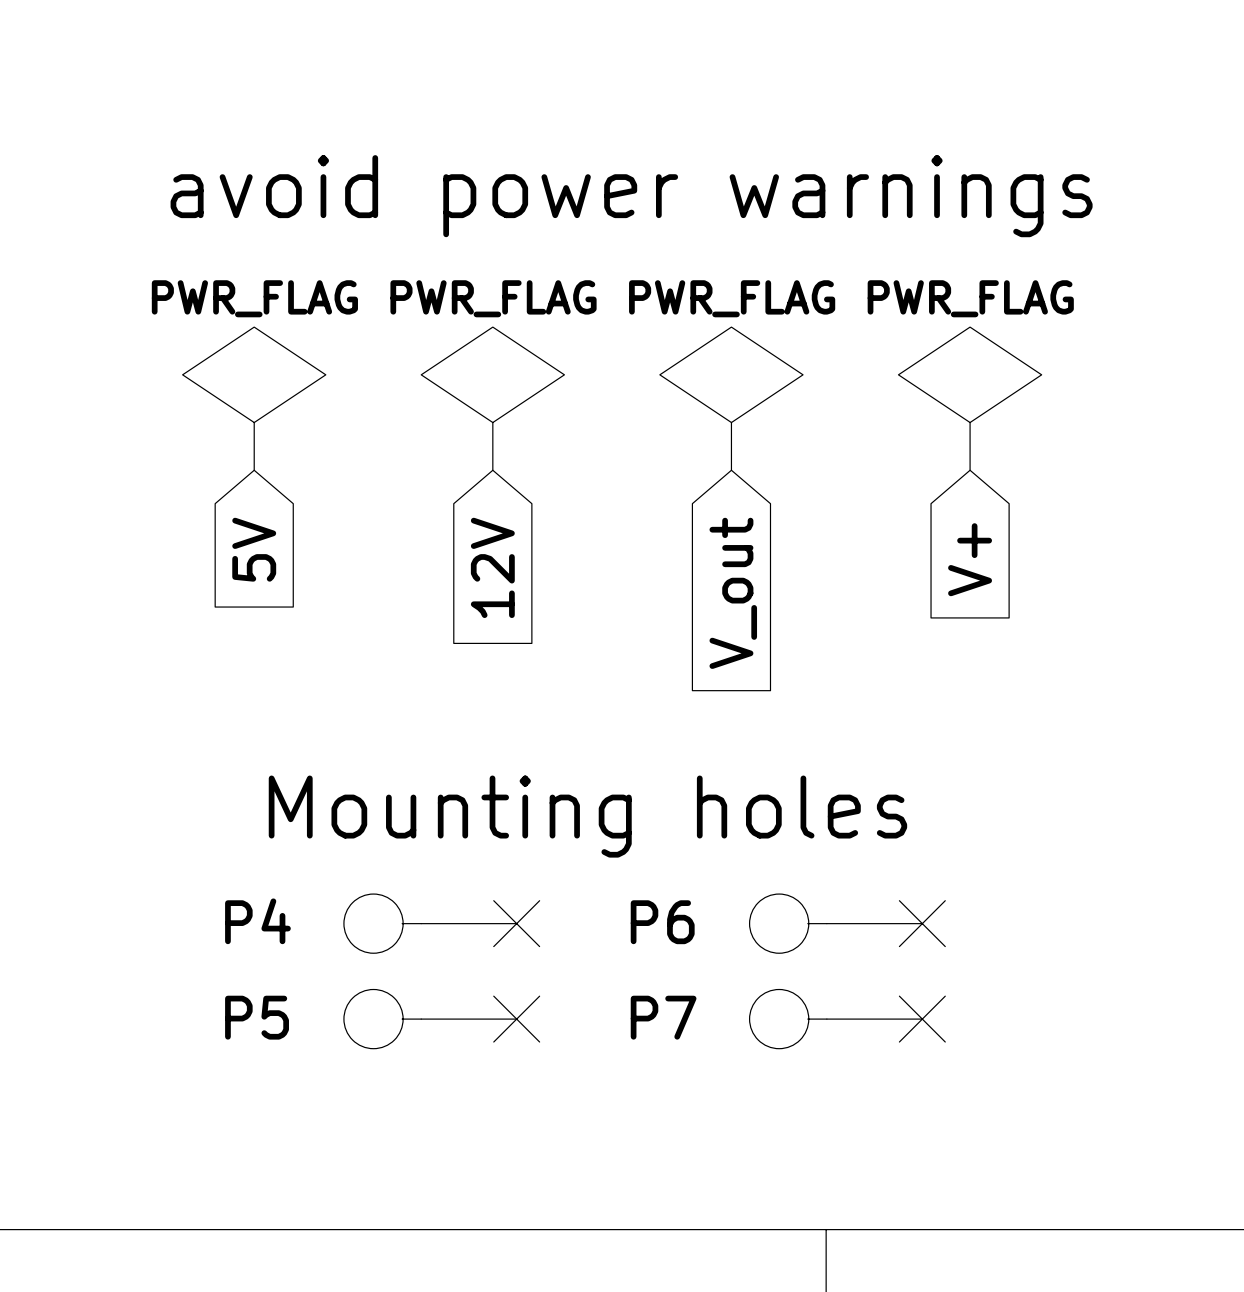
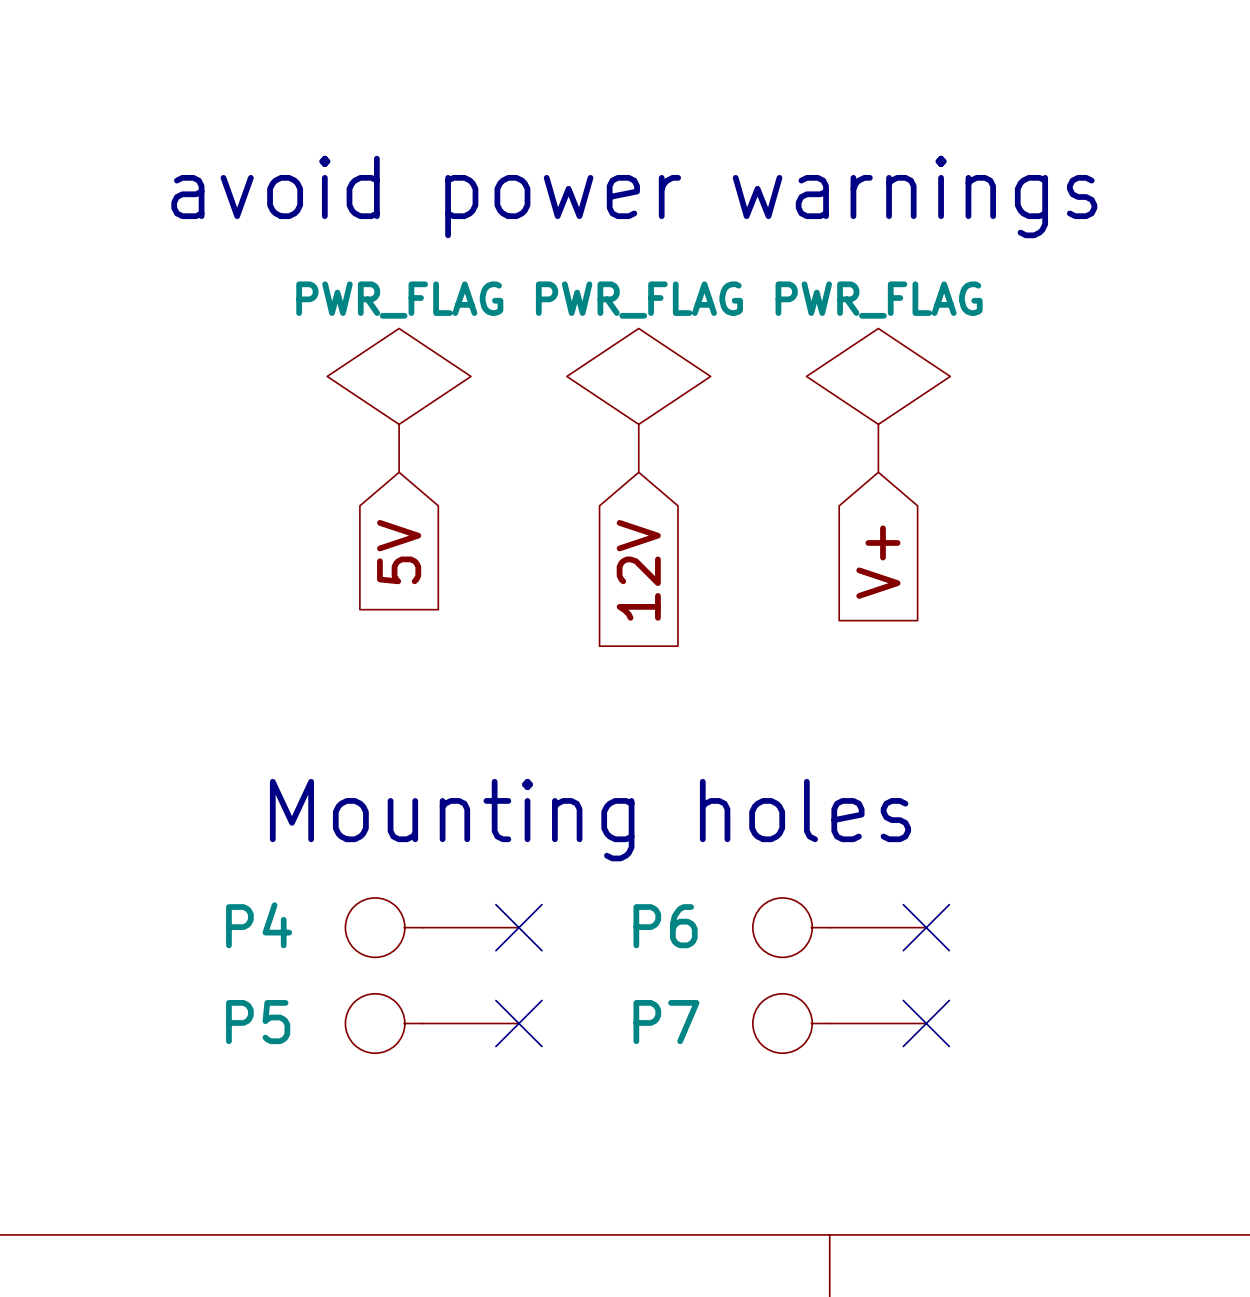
power symbol: PWR_FLAG (254, 398) -> none
power symbol: none -> PWR_FLAG (399, 400)
power symbol: PWR_FLAG (492, 398) -> none
power symbol: none -> PWR_FLAG (638, 400)
power symbol: PWR_FLAG (731, 398) -> none
power symbol: none -> PWR_FLAG (878, 400)
power symbol: PWR_FLAG (970, 398) -> none
global label position: 5V (254, 549) -> 5V (399, 552)
global label position: V+ (970, 559) -> V+ (878, 562)
global label position: 12V (492, 567) -> 12V (638, 570)
global label: V_out (733, 593) -> none

